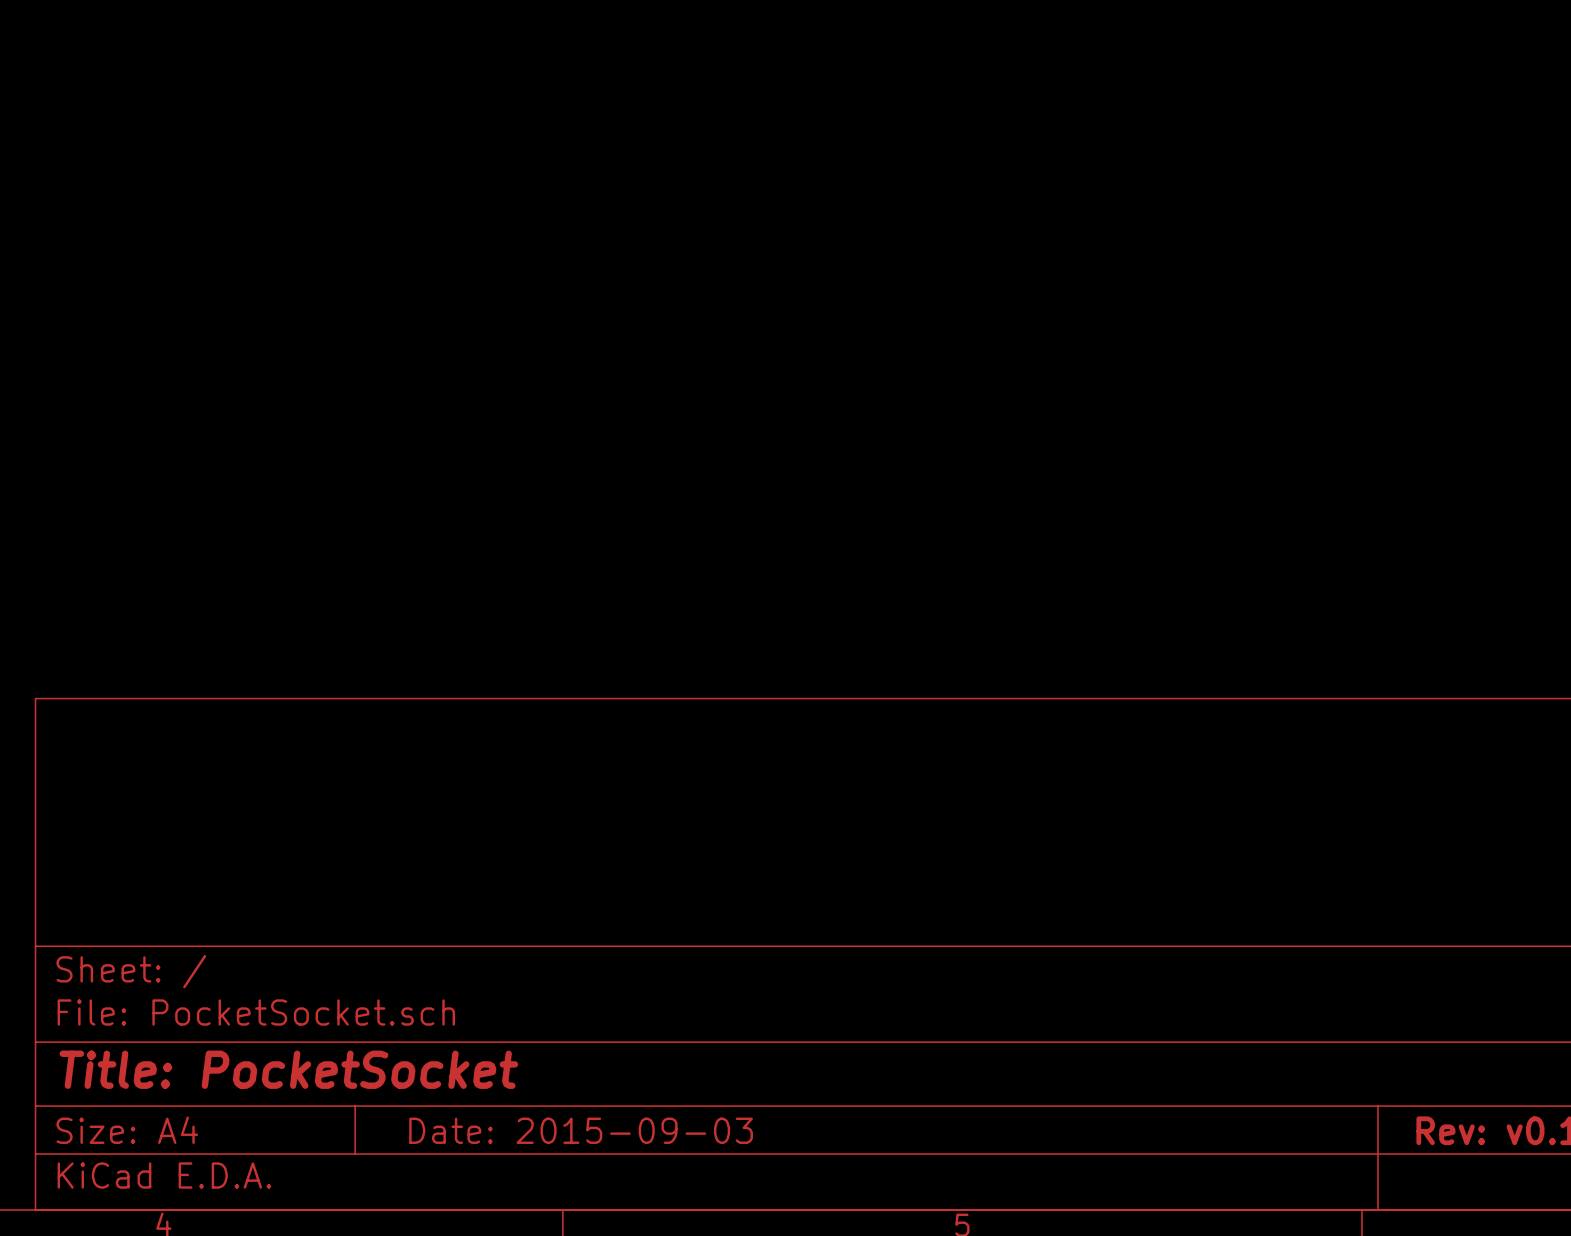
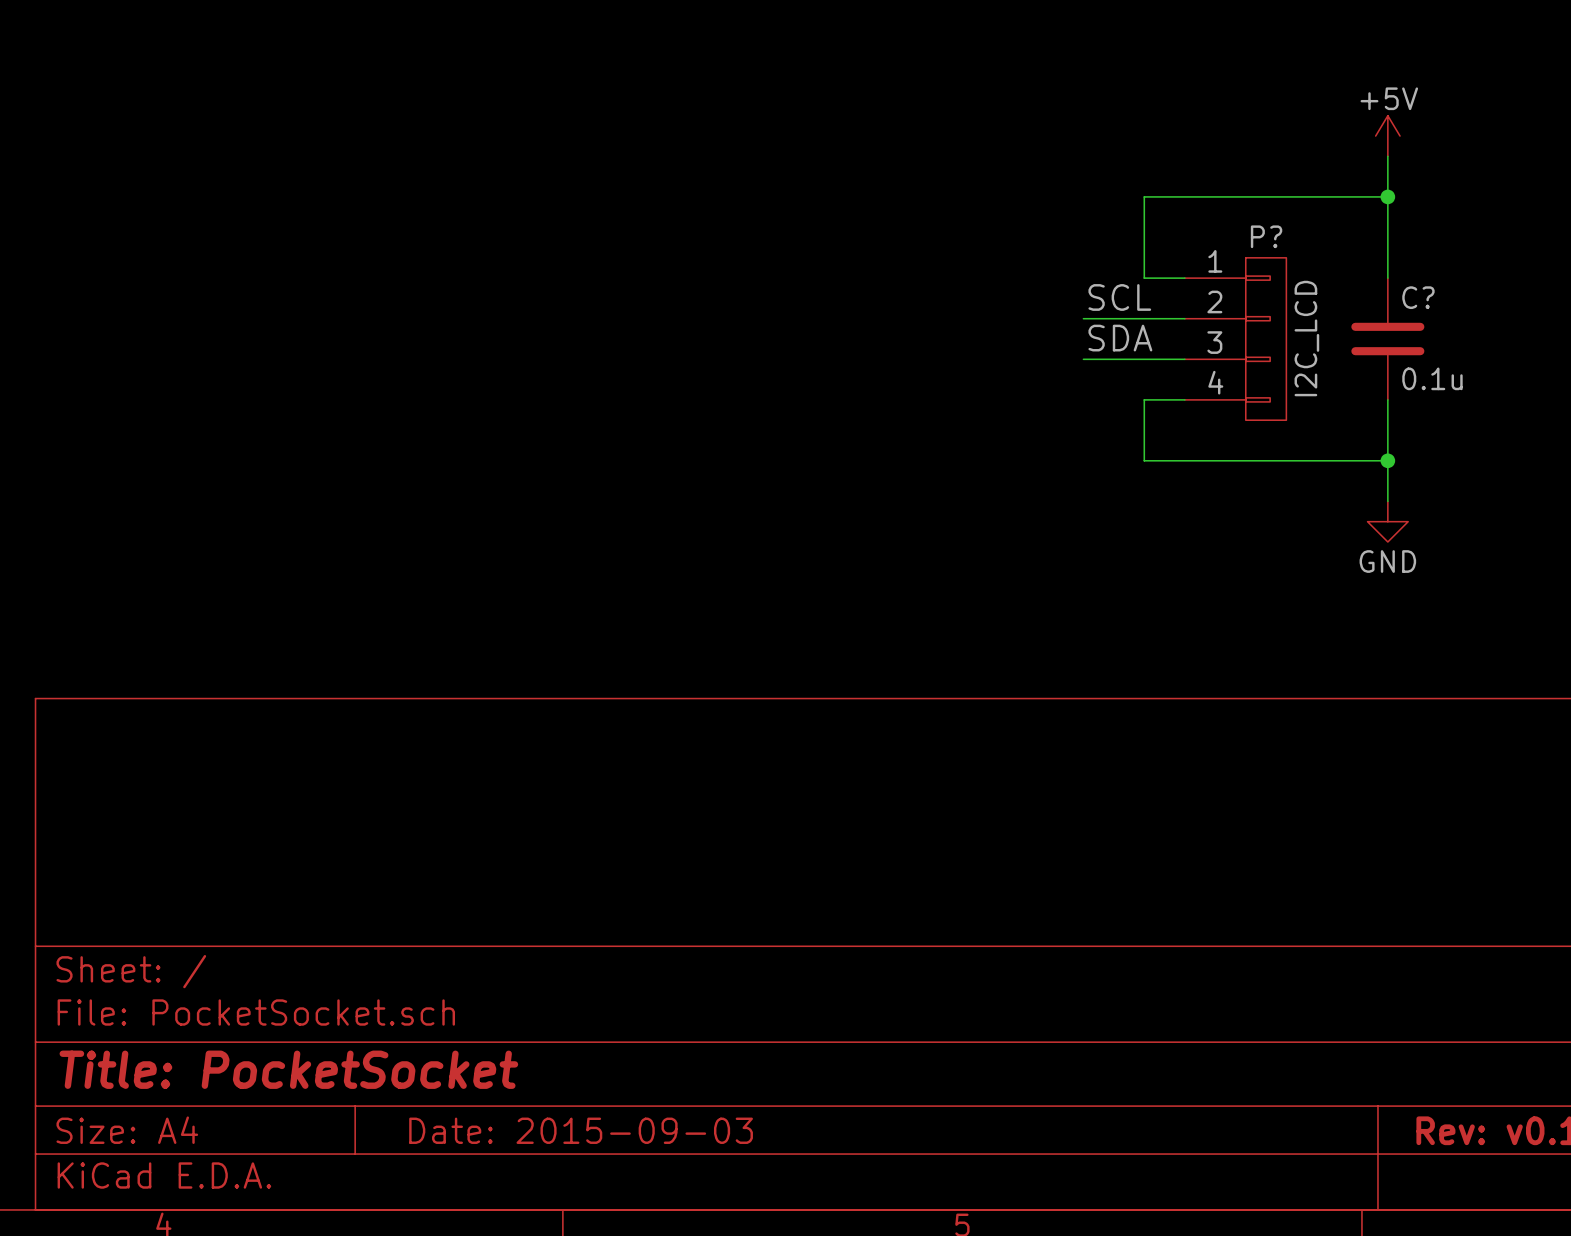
power symbol: none -> +5V (1387, 136)
wire: none -> (1387, 156) (1387, 278)
wire: none -> (1387, 196) (1144, 196) (1144, 278) (1184, 278)
junction: none -> (1387, 196)
label: none -> SCL (1119, 297)
wire: none -> (1083, 318) (1184, 318)
label: none -> SDA (1120, 338)
P?: none -> I2C_LCD (1235, 339)
C?: none -> 0.1u (1387, 339)
wire: none -> (1083, 359) (1184, 359)
wire: none -> (1184, 399) (1144, 399) (1144, 460) (1387, 460)
wire: none -> (1387, 399) (1387, 501)
junction: none -> (1387, 460)
power symbol: none -> GND (1387, 521)

